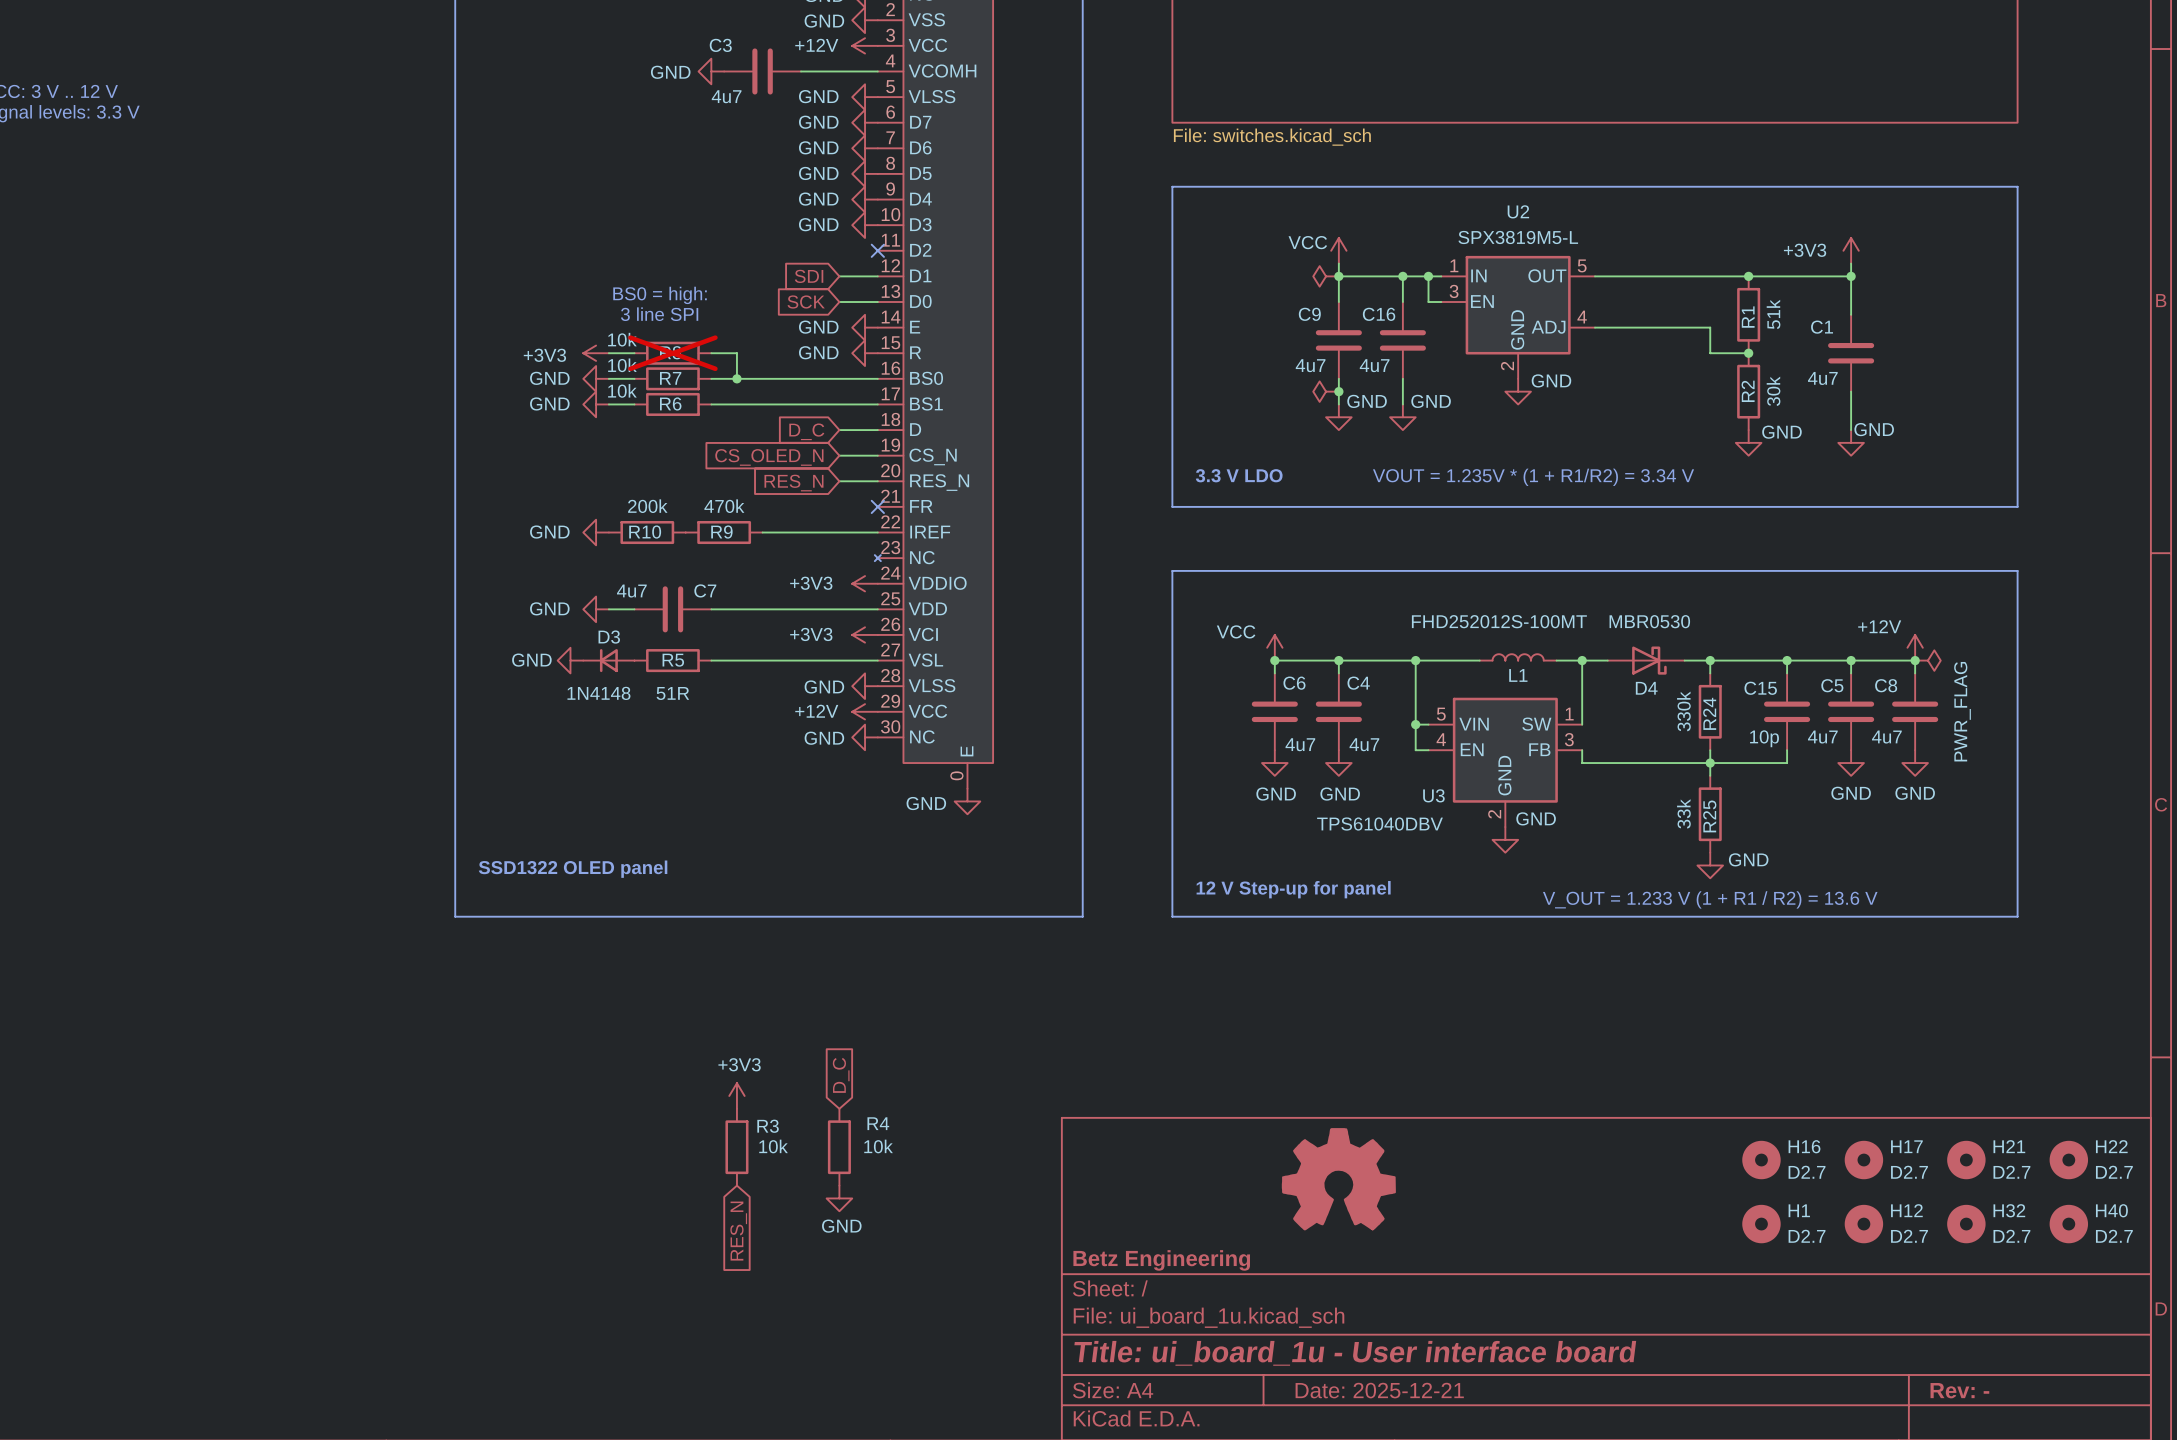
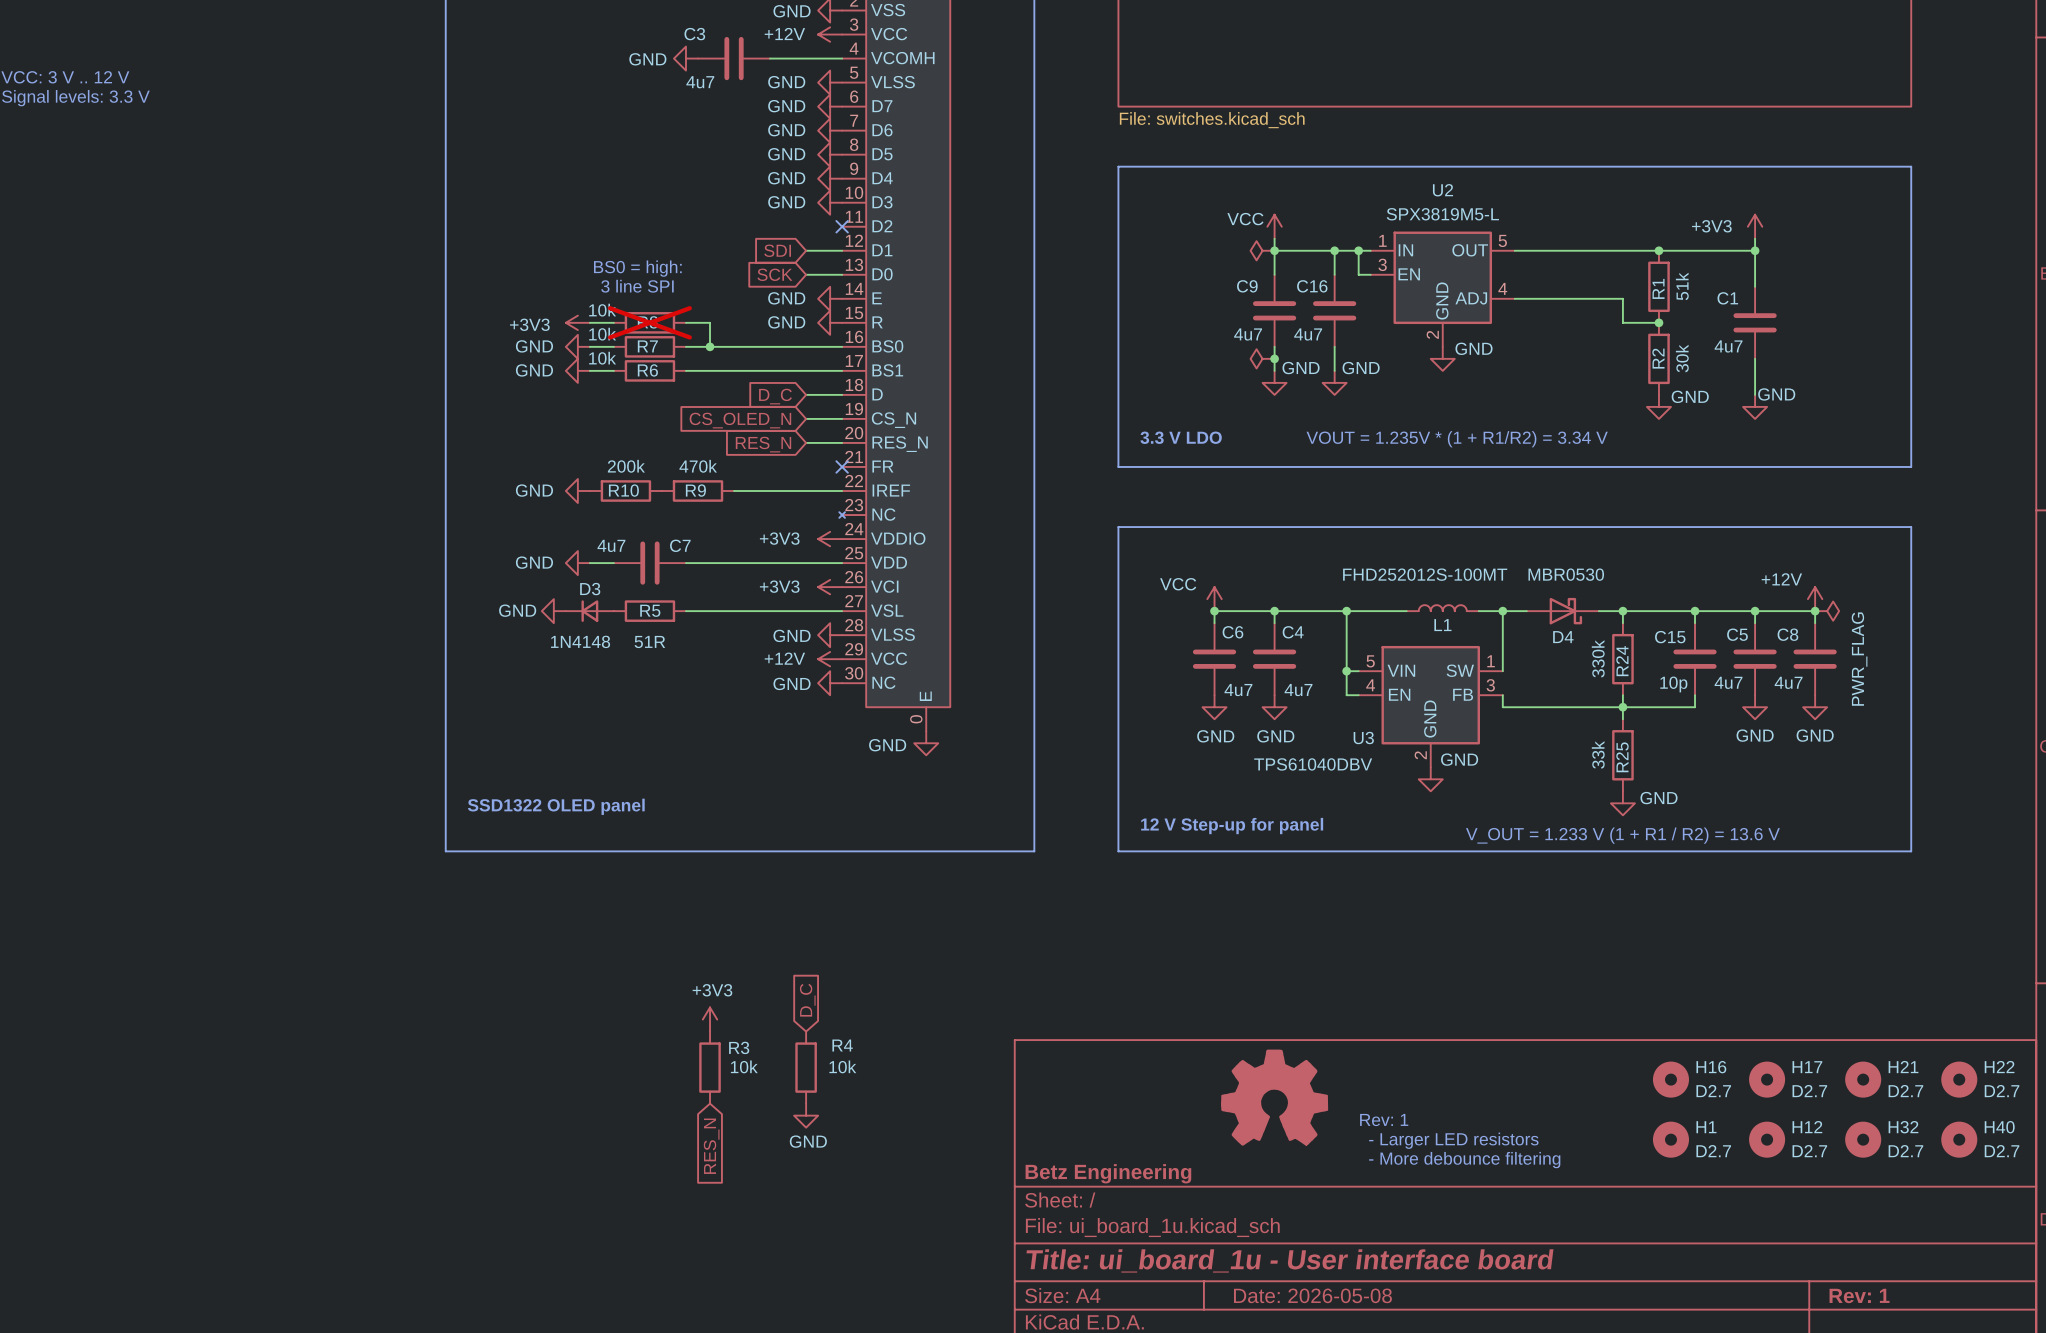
text: none -> Rev: 1 (1384, 1120)
text: none -> - Larger LED resistors (1453, 1140)
text: none -> - More debounce filtering (1464, 1160)
title block: Date: 2025-12-21 (1379, 1390) -> Date: 2026-05-08 (1312, 1295)
title block: Rev: - (1959, 1390) -> Rev: 1 (1859, 1295)

